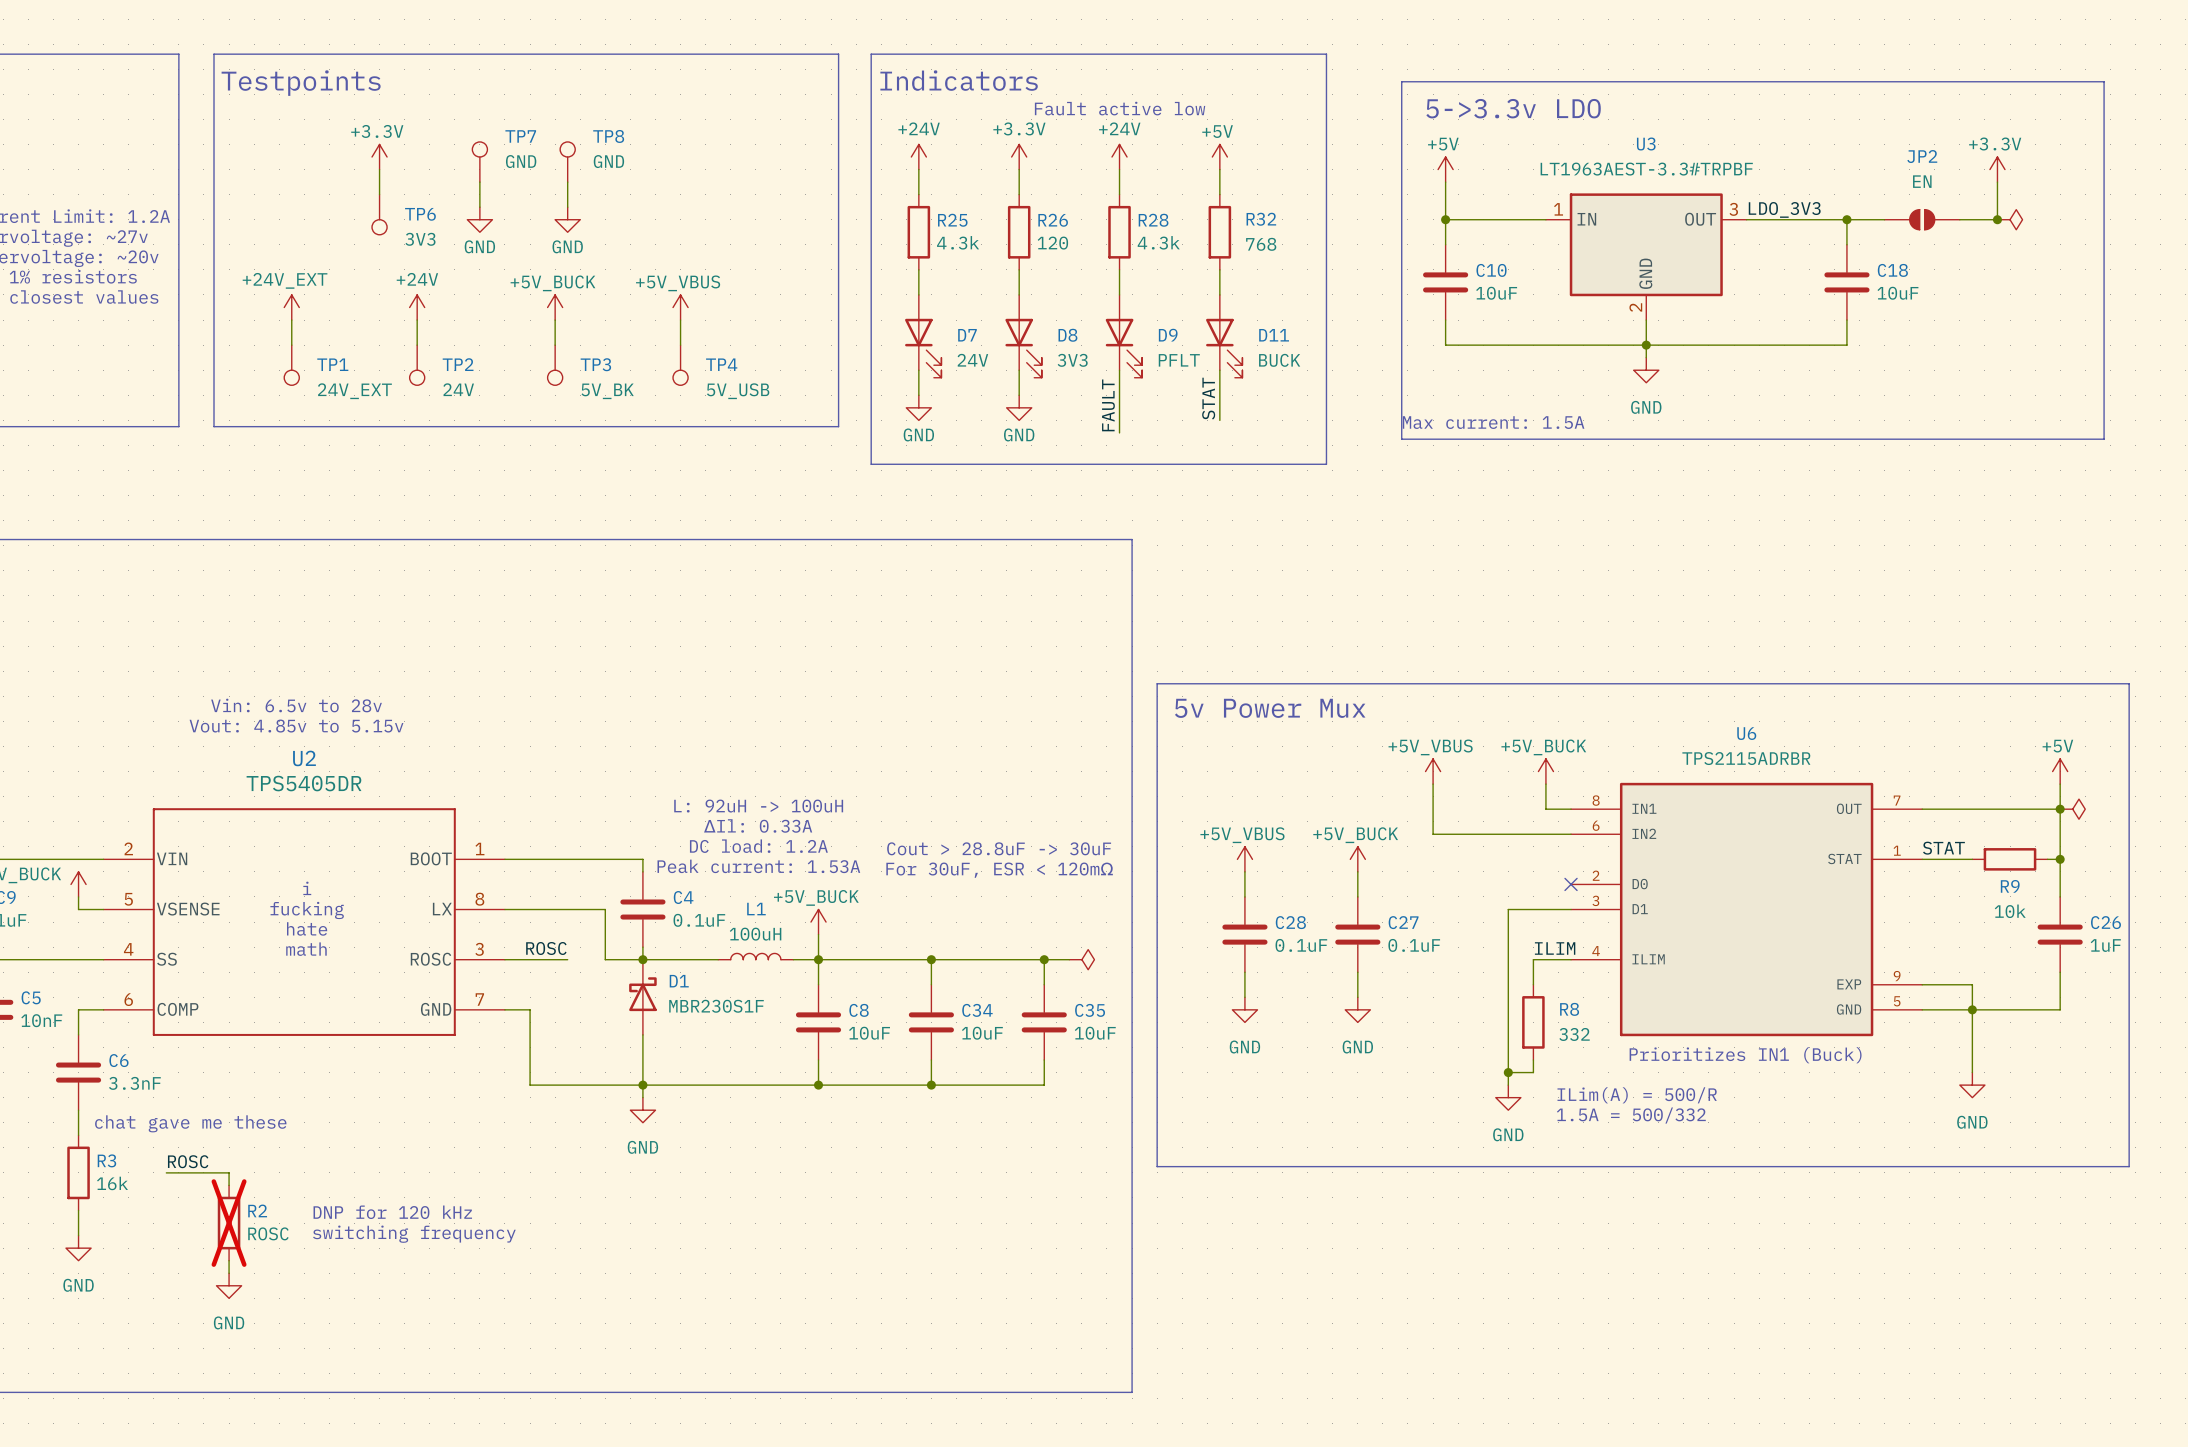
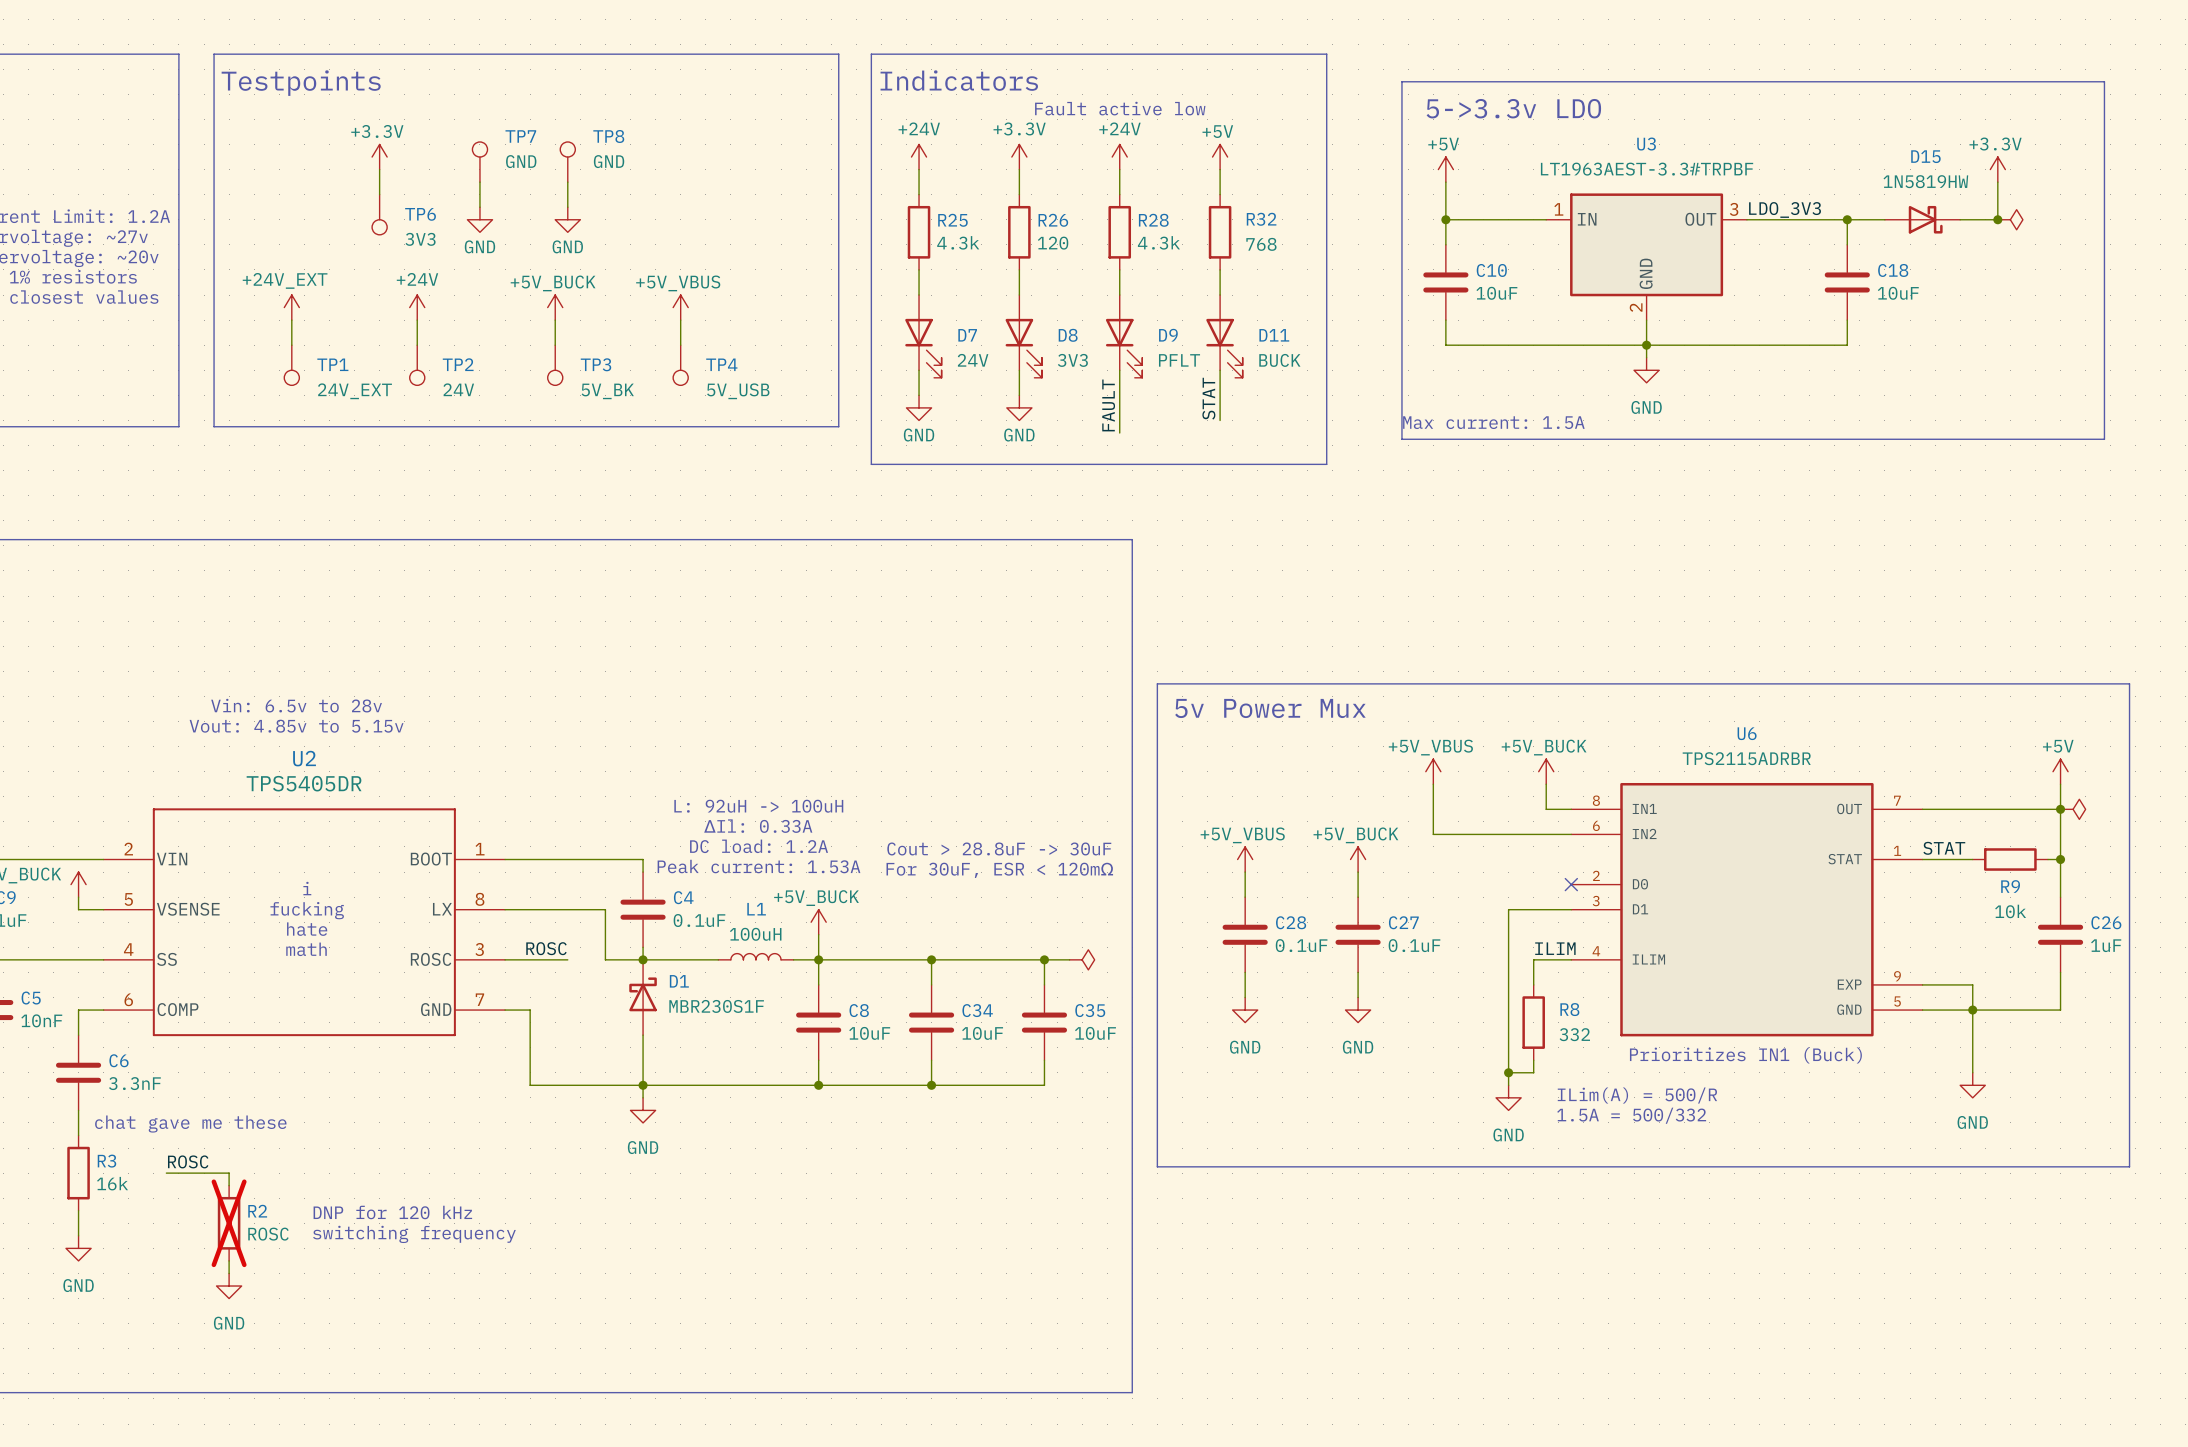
JP2: EN (1922, 219) -> none
D15: none -> 1N5819HW (1922, 219)

